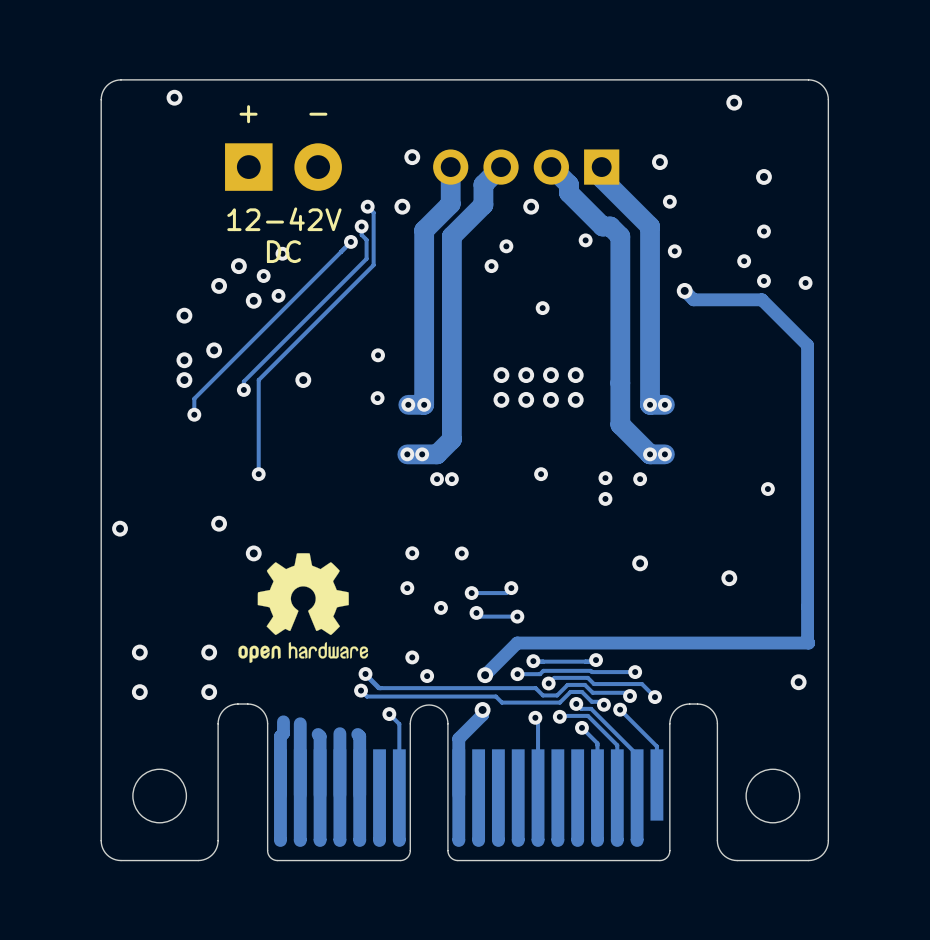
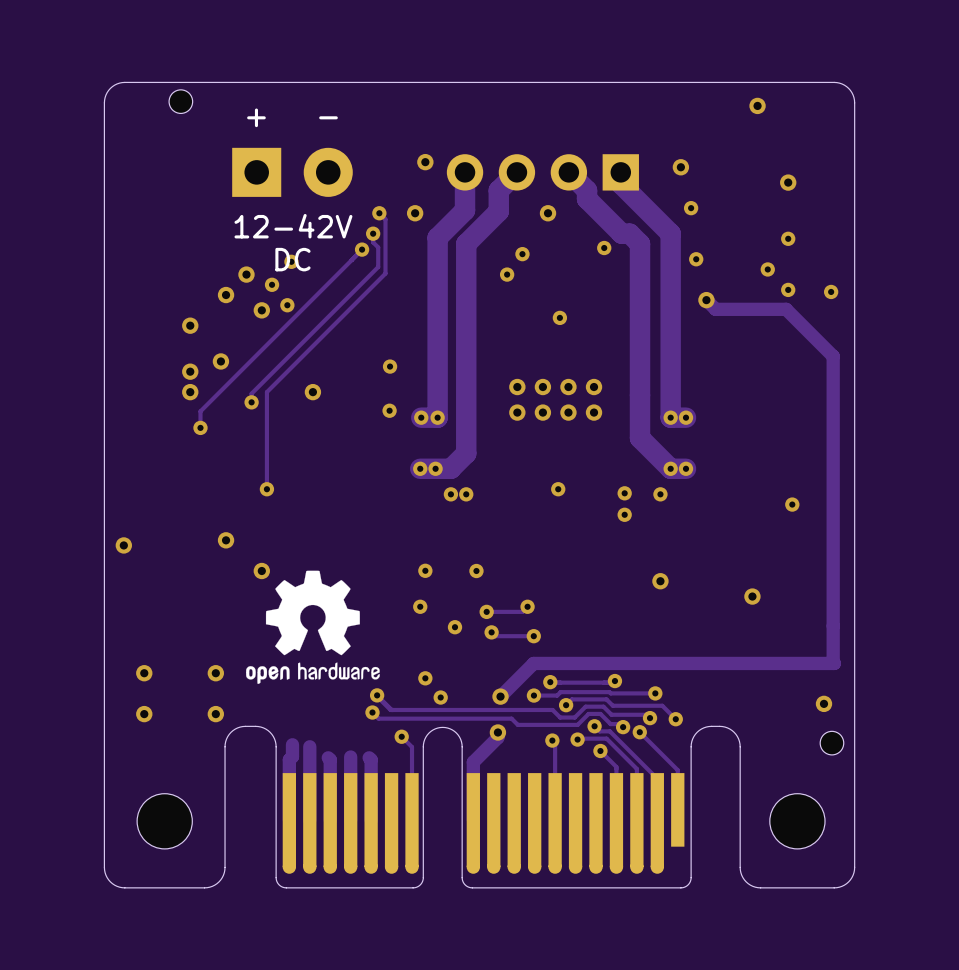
via: (174, 97) -> none
part: none -> (180, 101)
part: none -> (831, 743)

